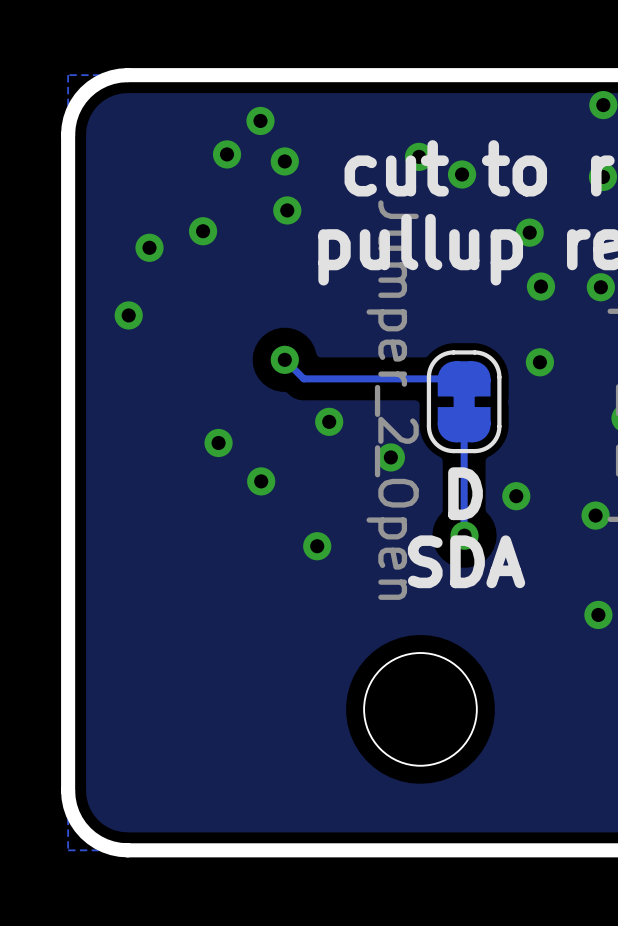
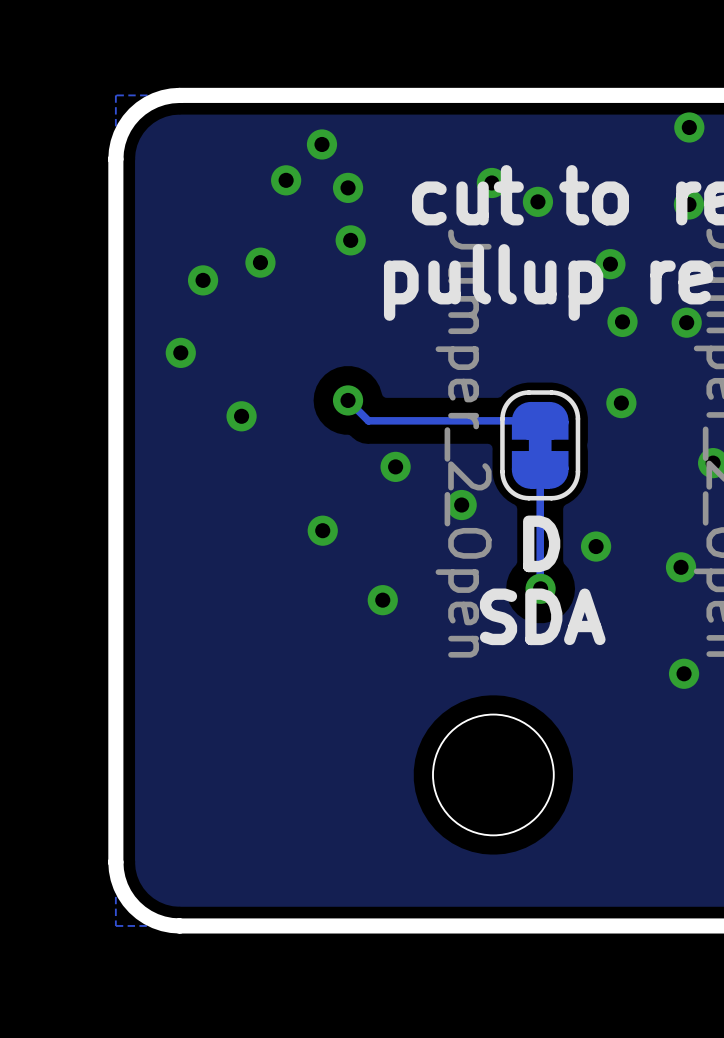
via position: (218, 442) -> (241, 416)

